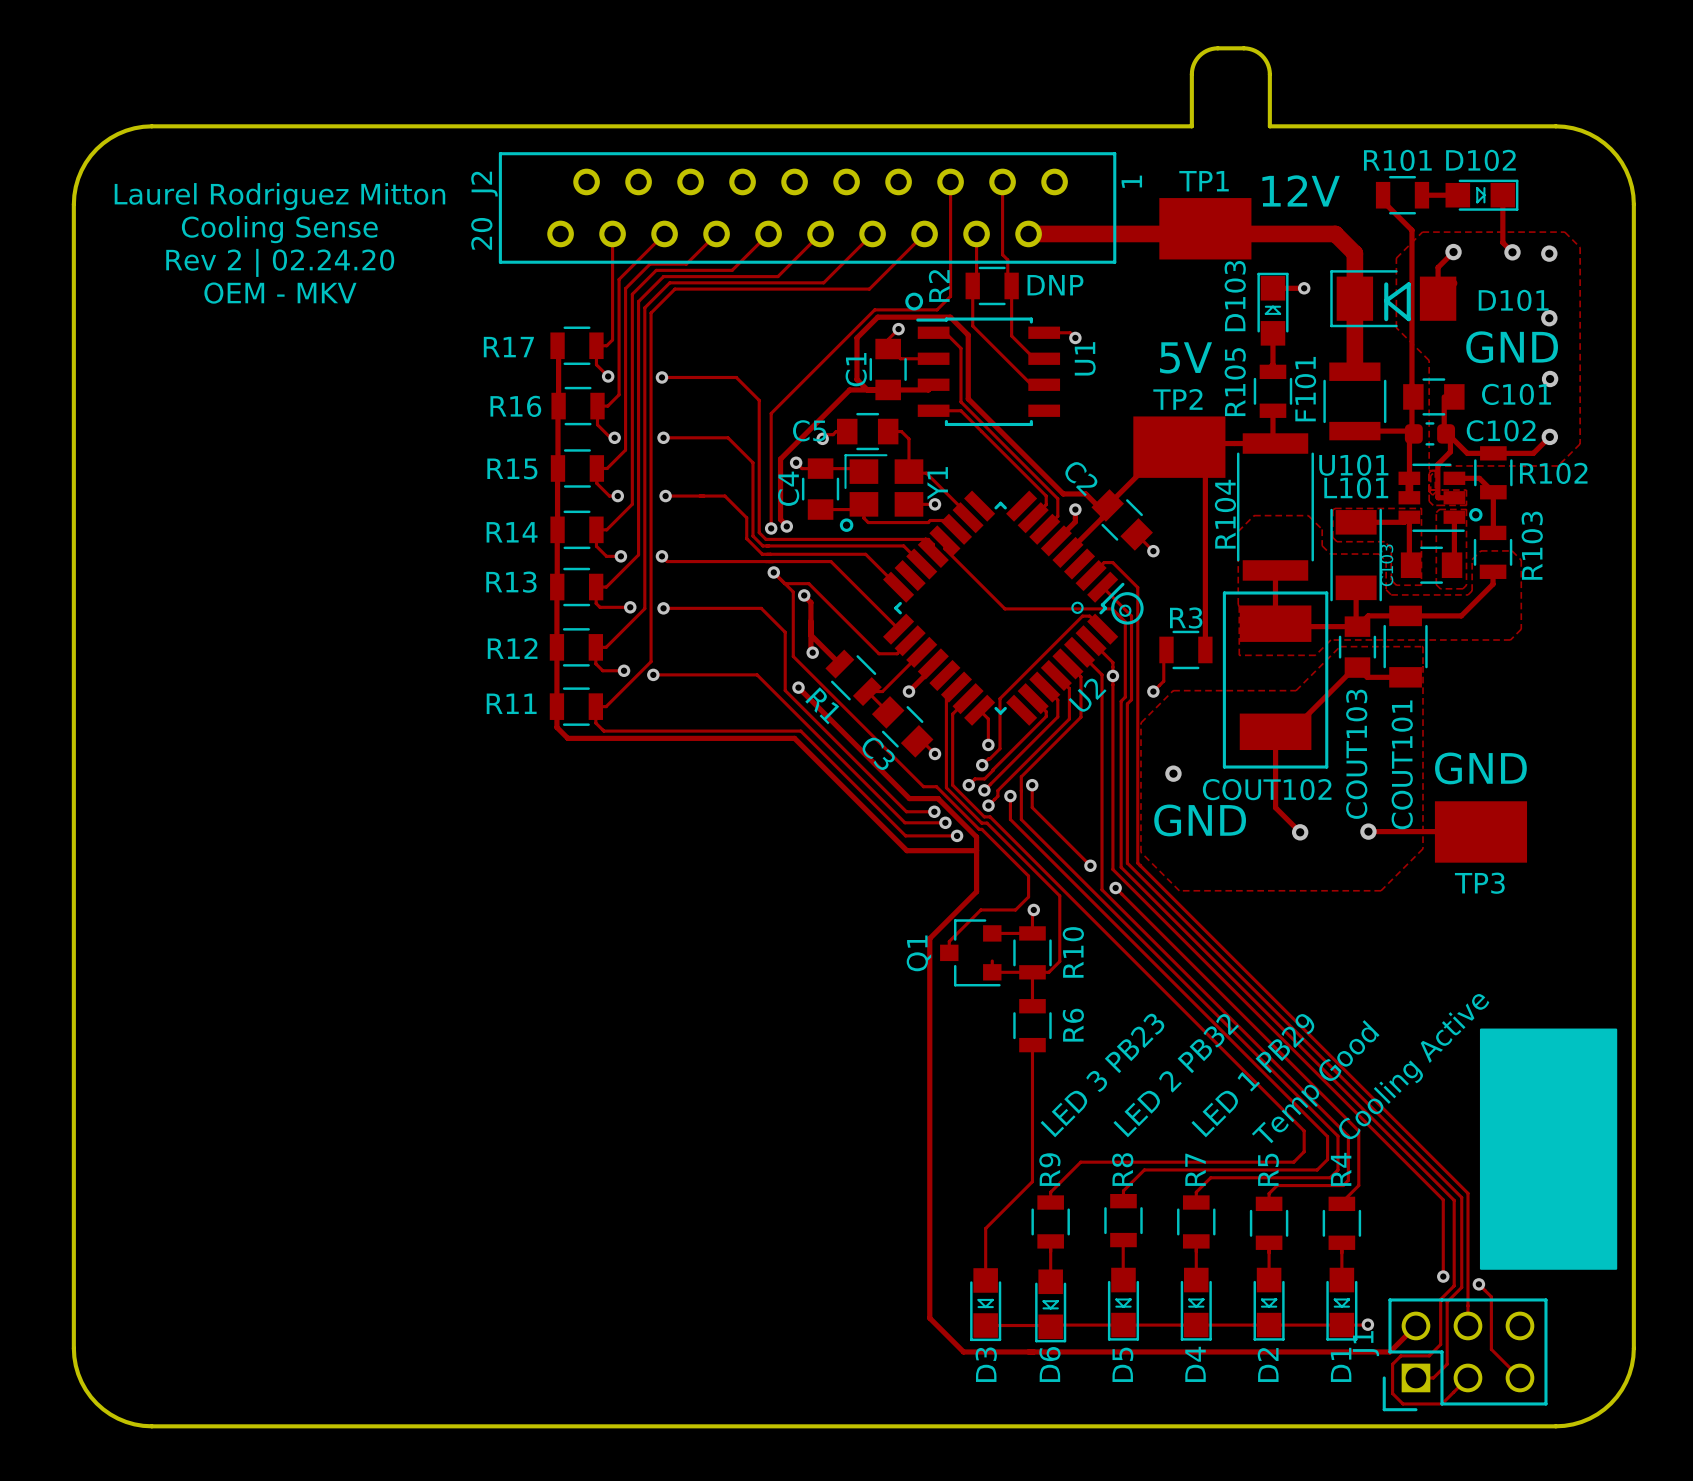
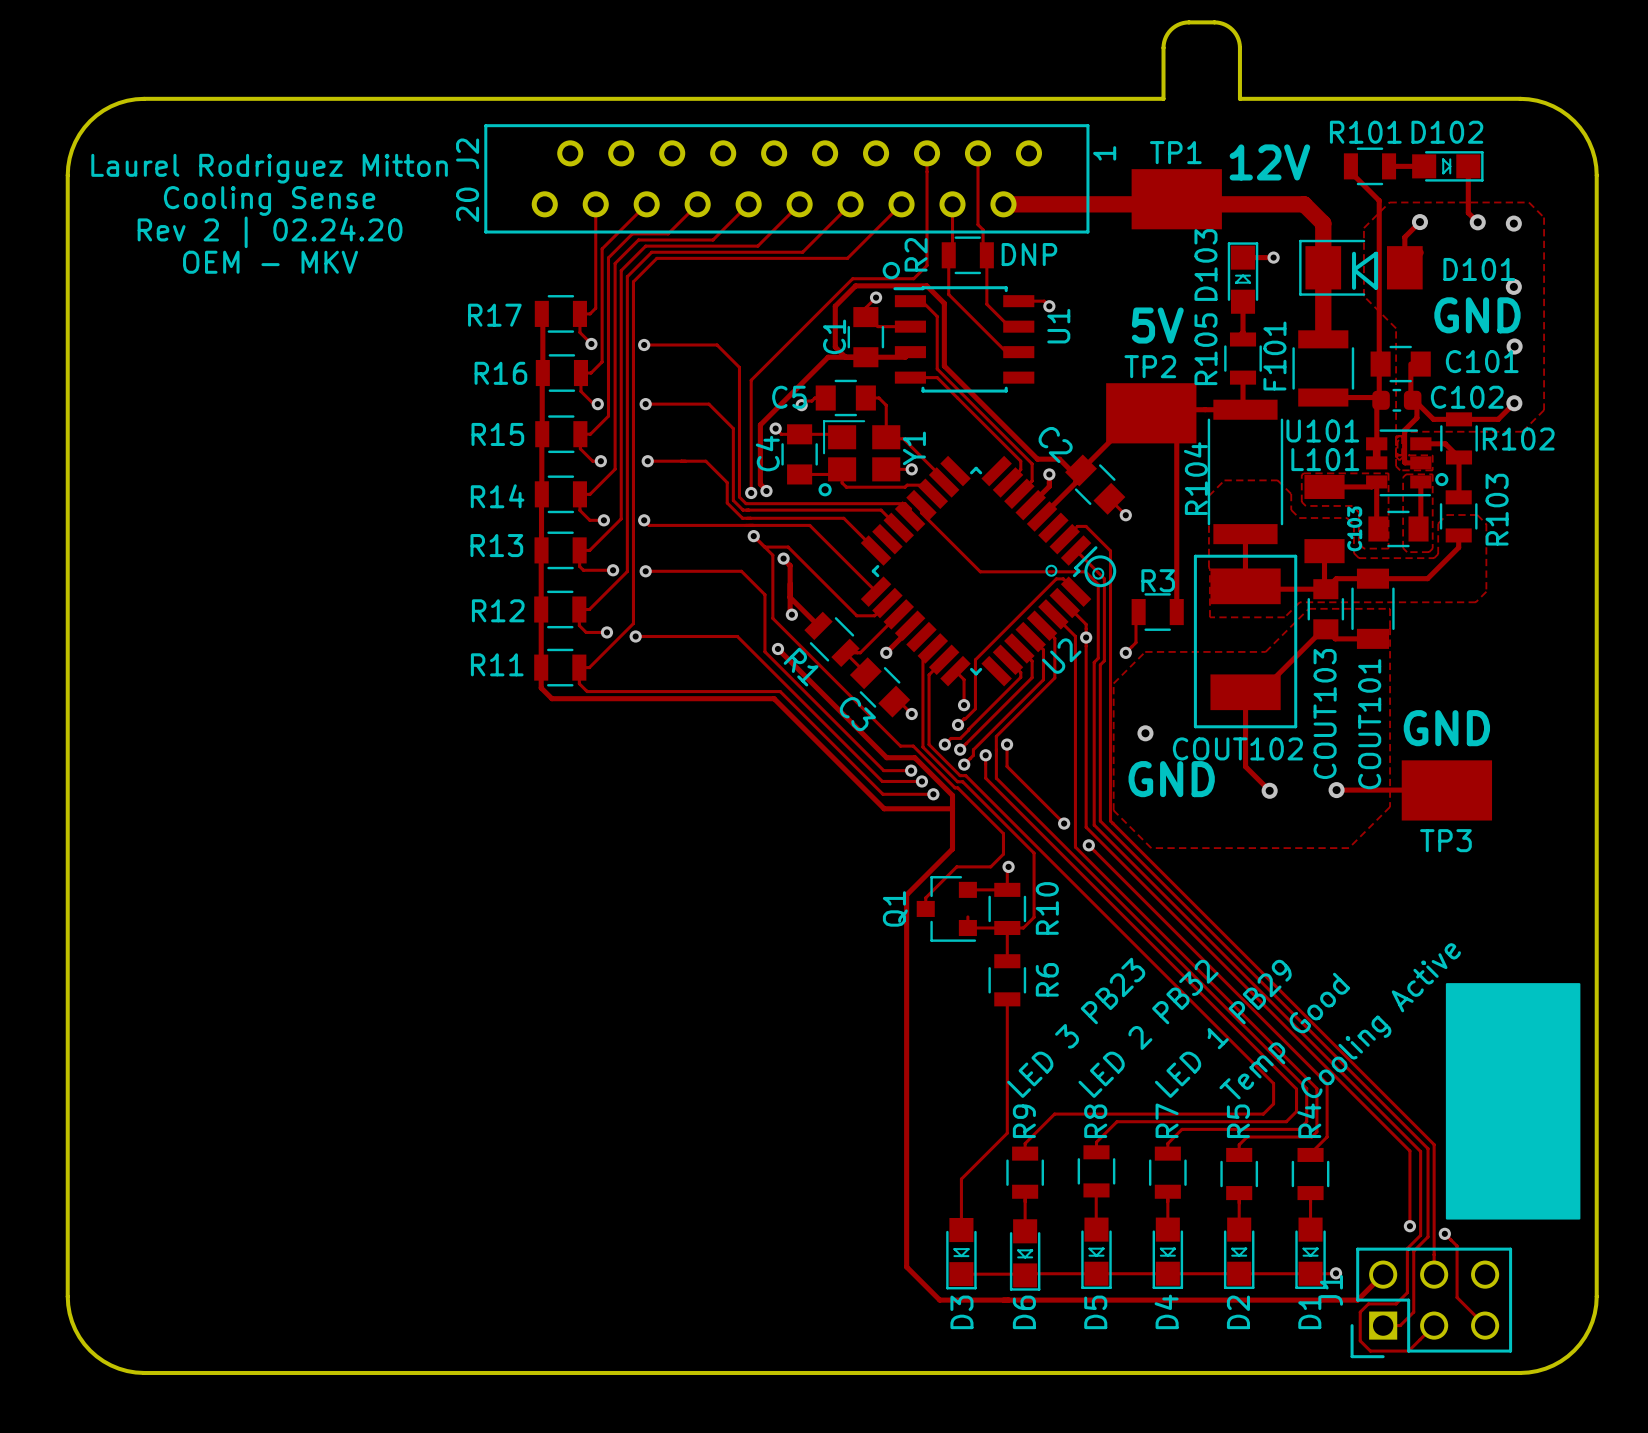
L101 footprint: [1330, 508, 1382, 602] -> [1304, 474, 1345, 564]

